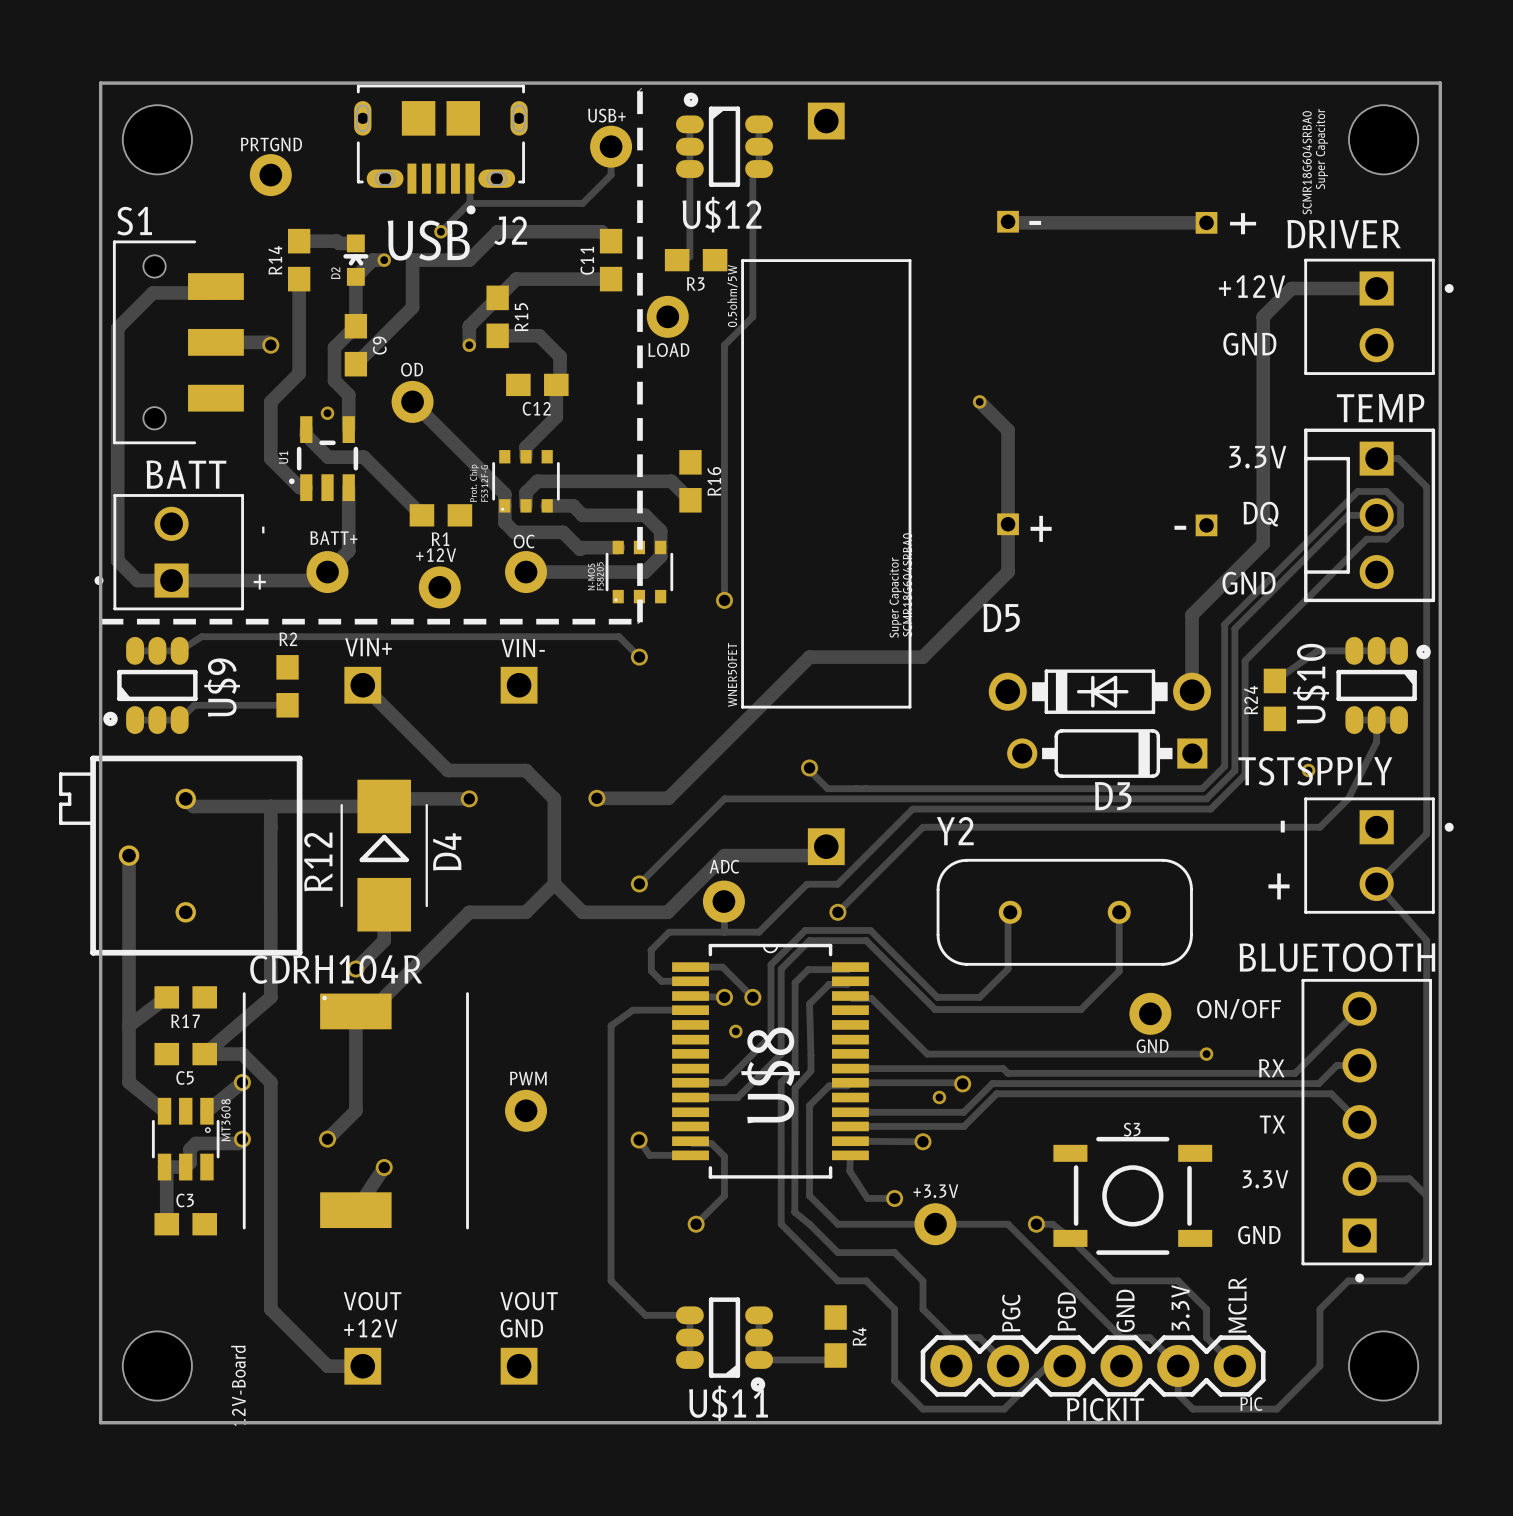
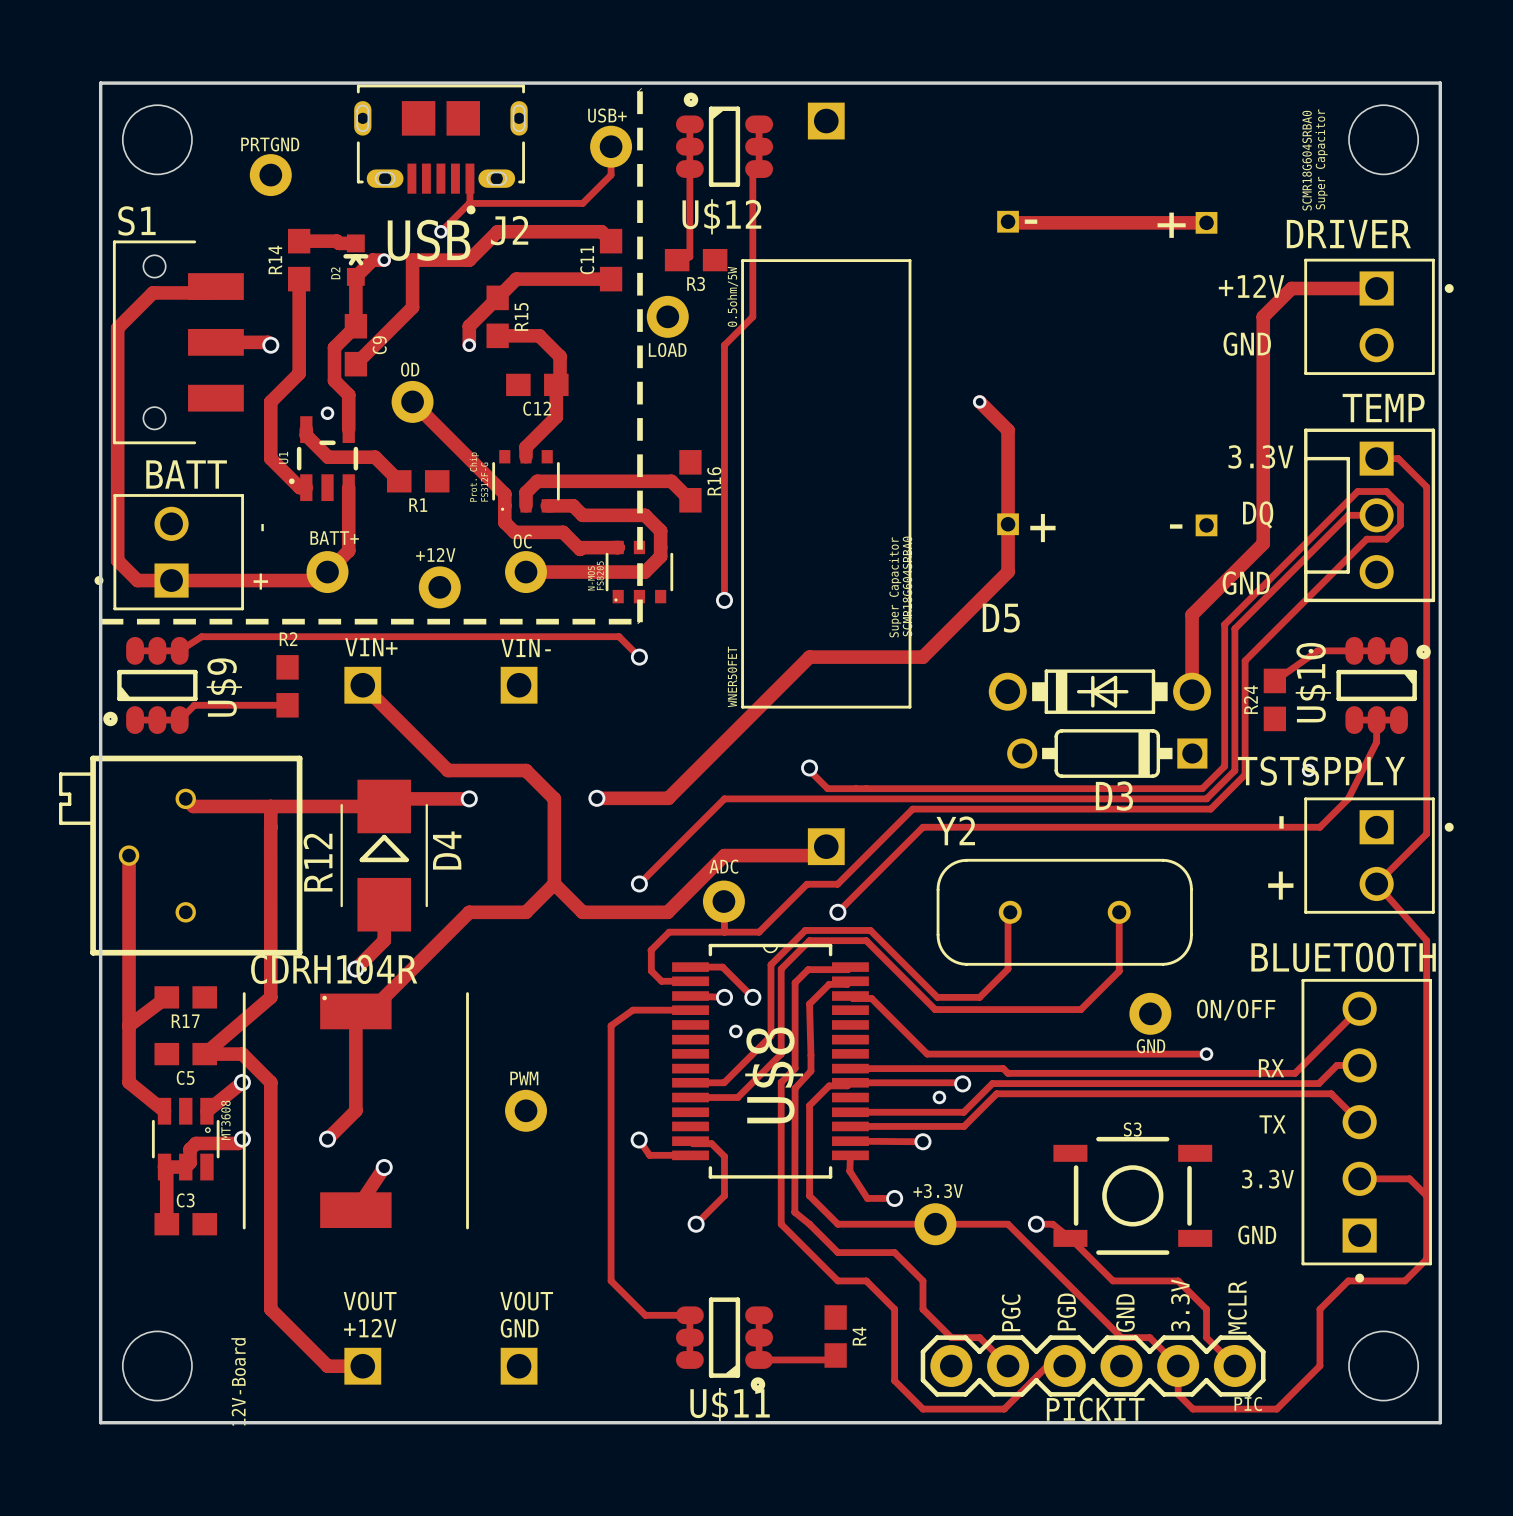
text position: + (1243, 223) -> + (1171, 225)
track: (363, 457) (421, 515) -> (363, 457) (375, 457) (399, 481)
R1 position: (440, 515) -> (418, 481)

